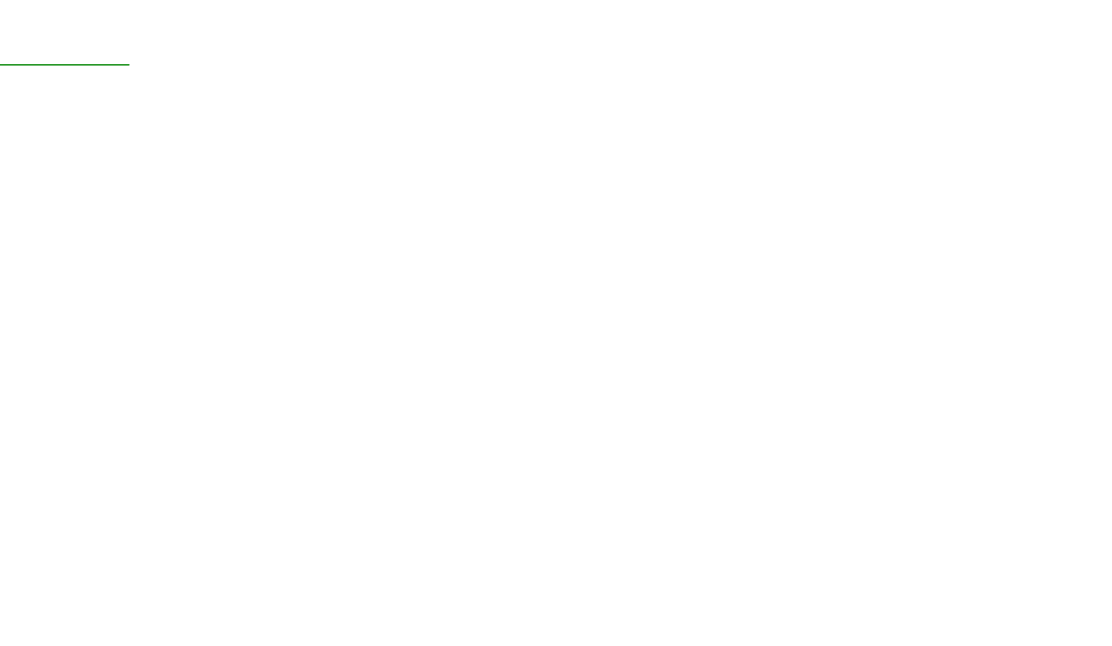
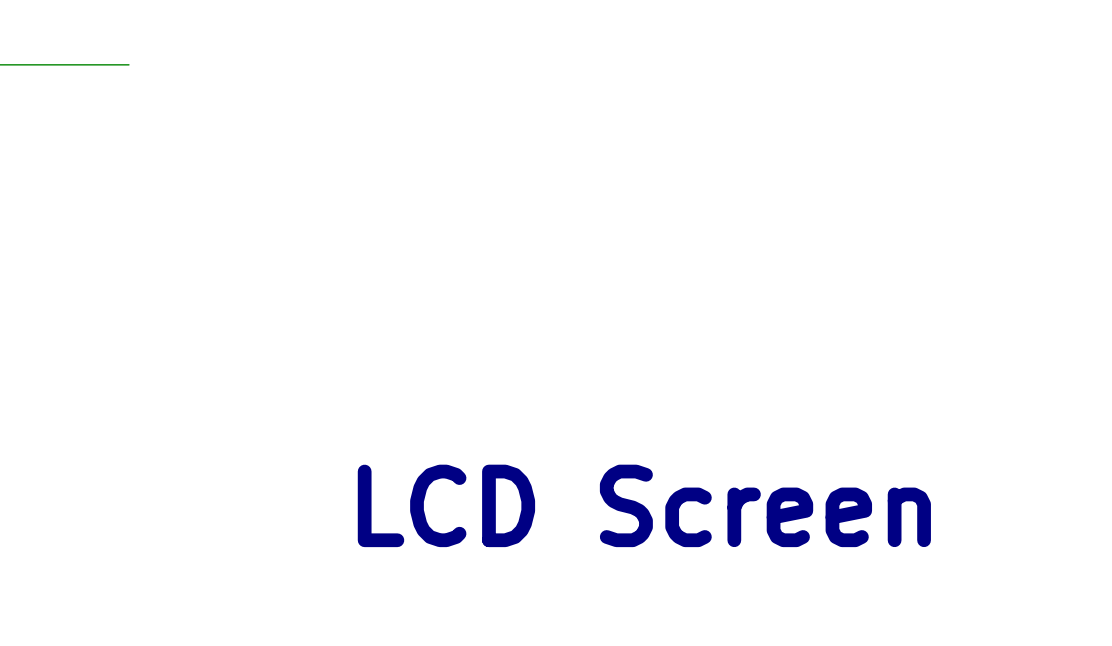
text: none -> LCD Screen (644, 505)

